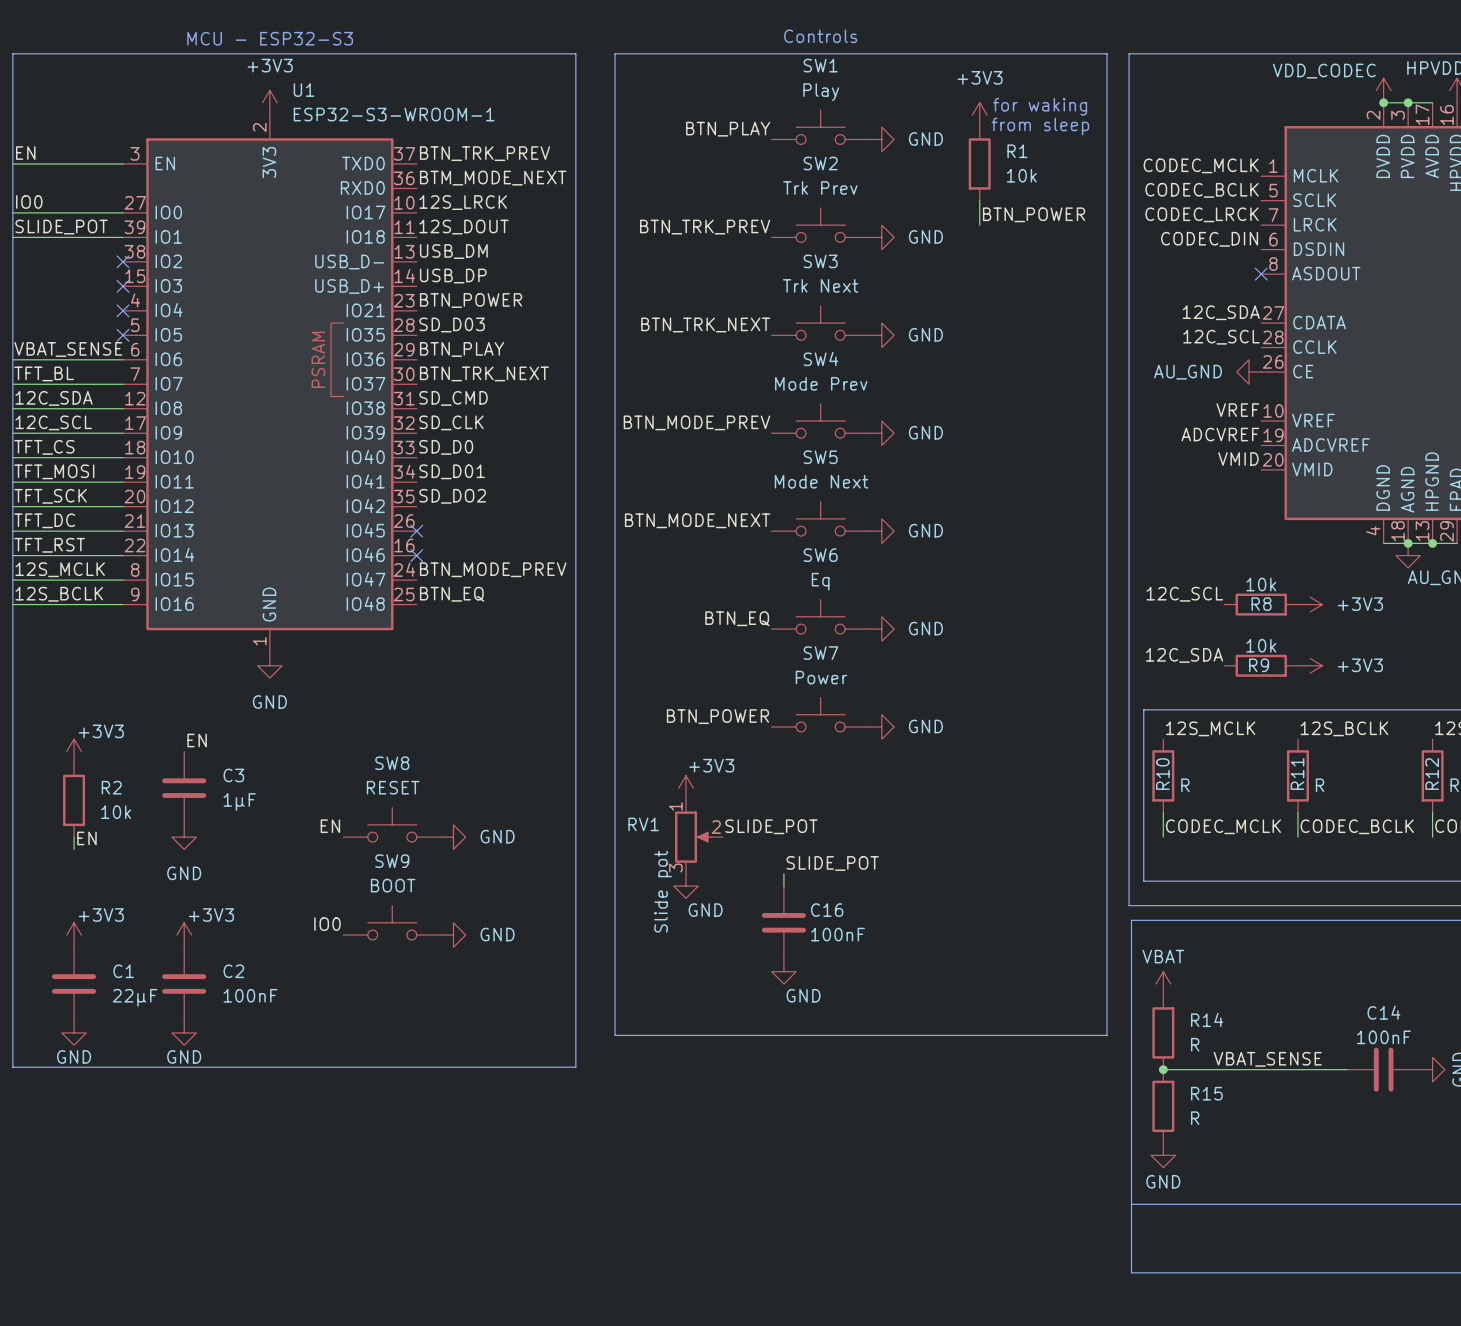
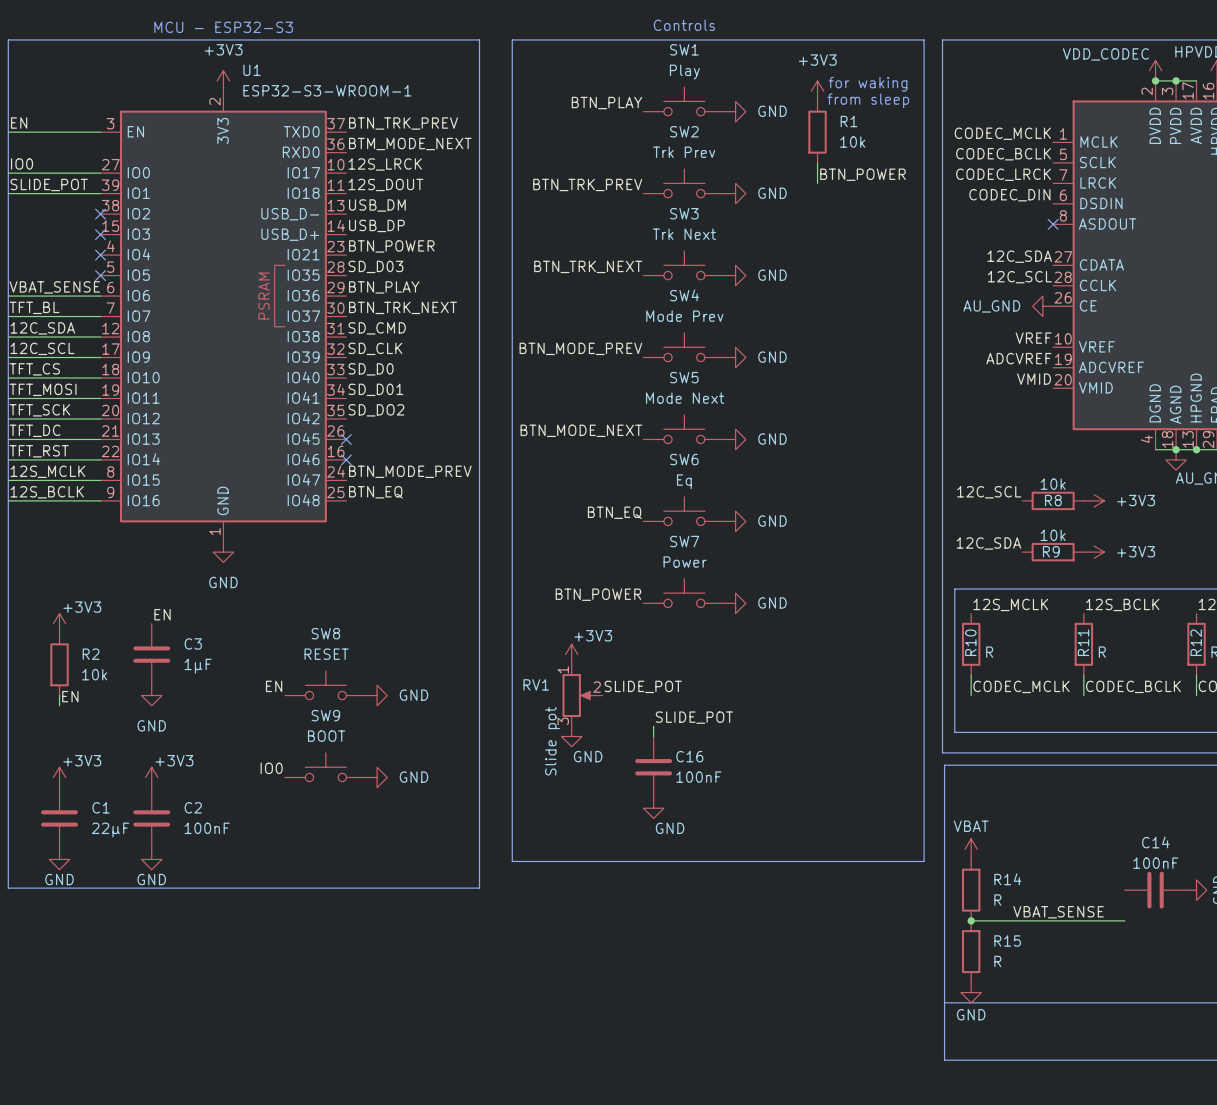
power symbol position: VBAT (1163, 983) -> VBAT (971, 849)
R14 position: (1163, 1032) -> (971, 890)
label position: VBAT_SENSE (1267, 1059) -> VBAT_SENSE (1058, 912)
wire: (1163, 1069) (1346, 1069) -> (971, 920) (1124, 920)
junction position: (1163, 1069) -> (971, 920)
R15 position: (1163, 1106) -> (971, 951)
power symbol position: GND (1163, 1155) -> GND (971, 992)

